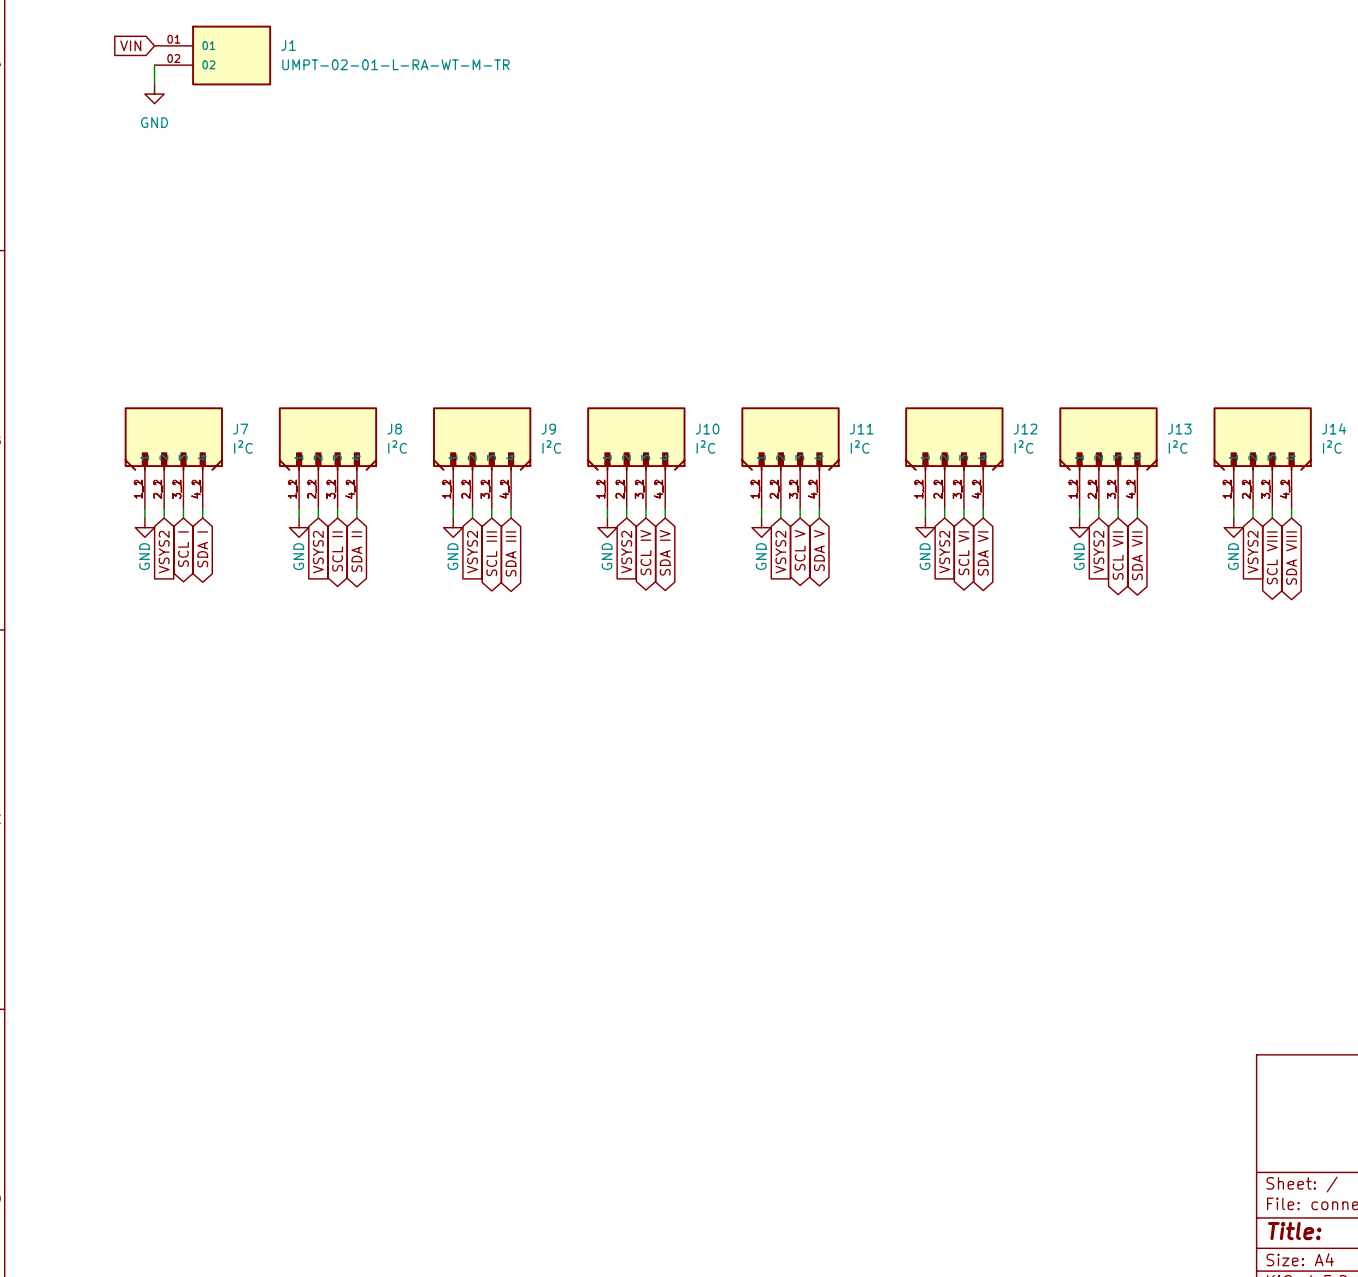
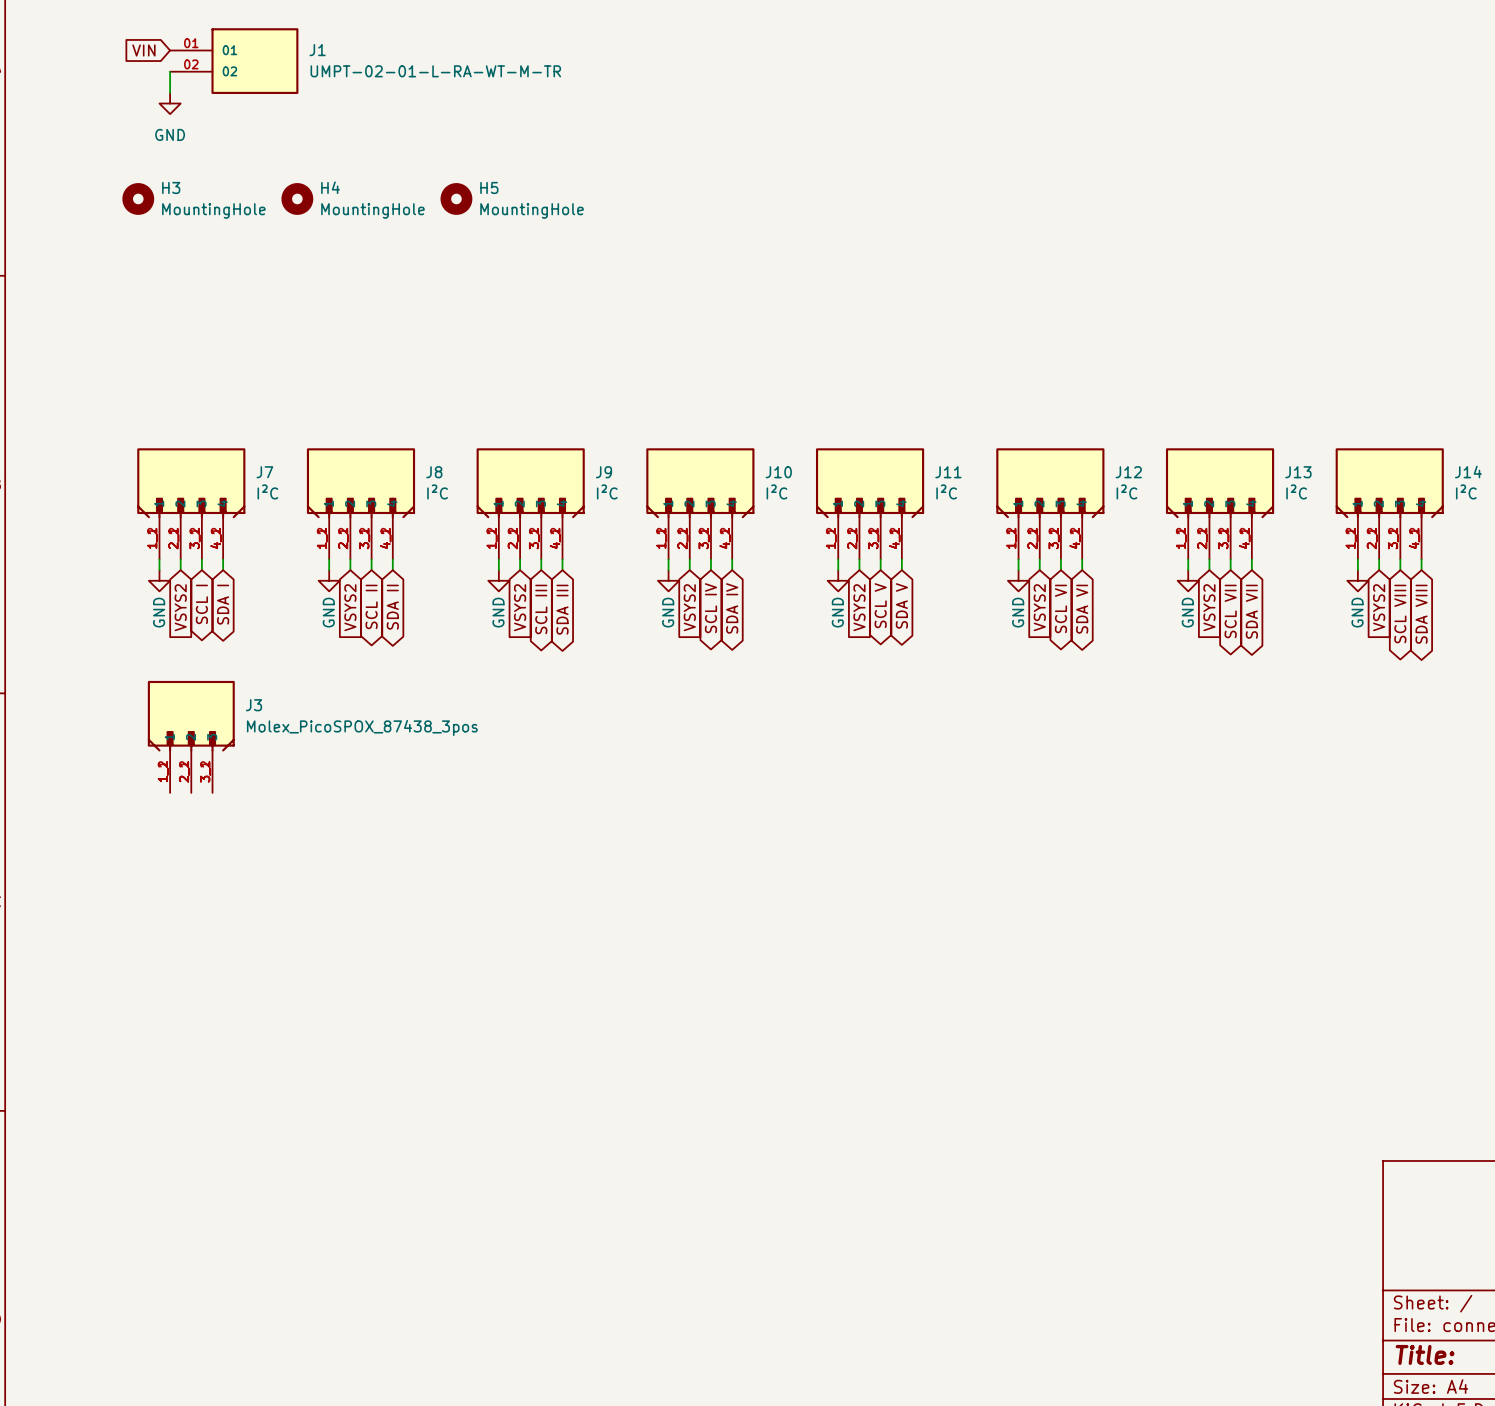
H3: none -> MountingHole (138, 198)
H4: none -> MountingHole (297, 198)
H5: none -> MountingHole (456, 198)
J3: none -> Molex_PicoSPOX_87438_3pos (191, 736)

